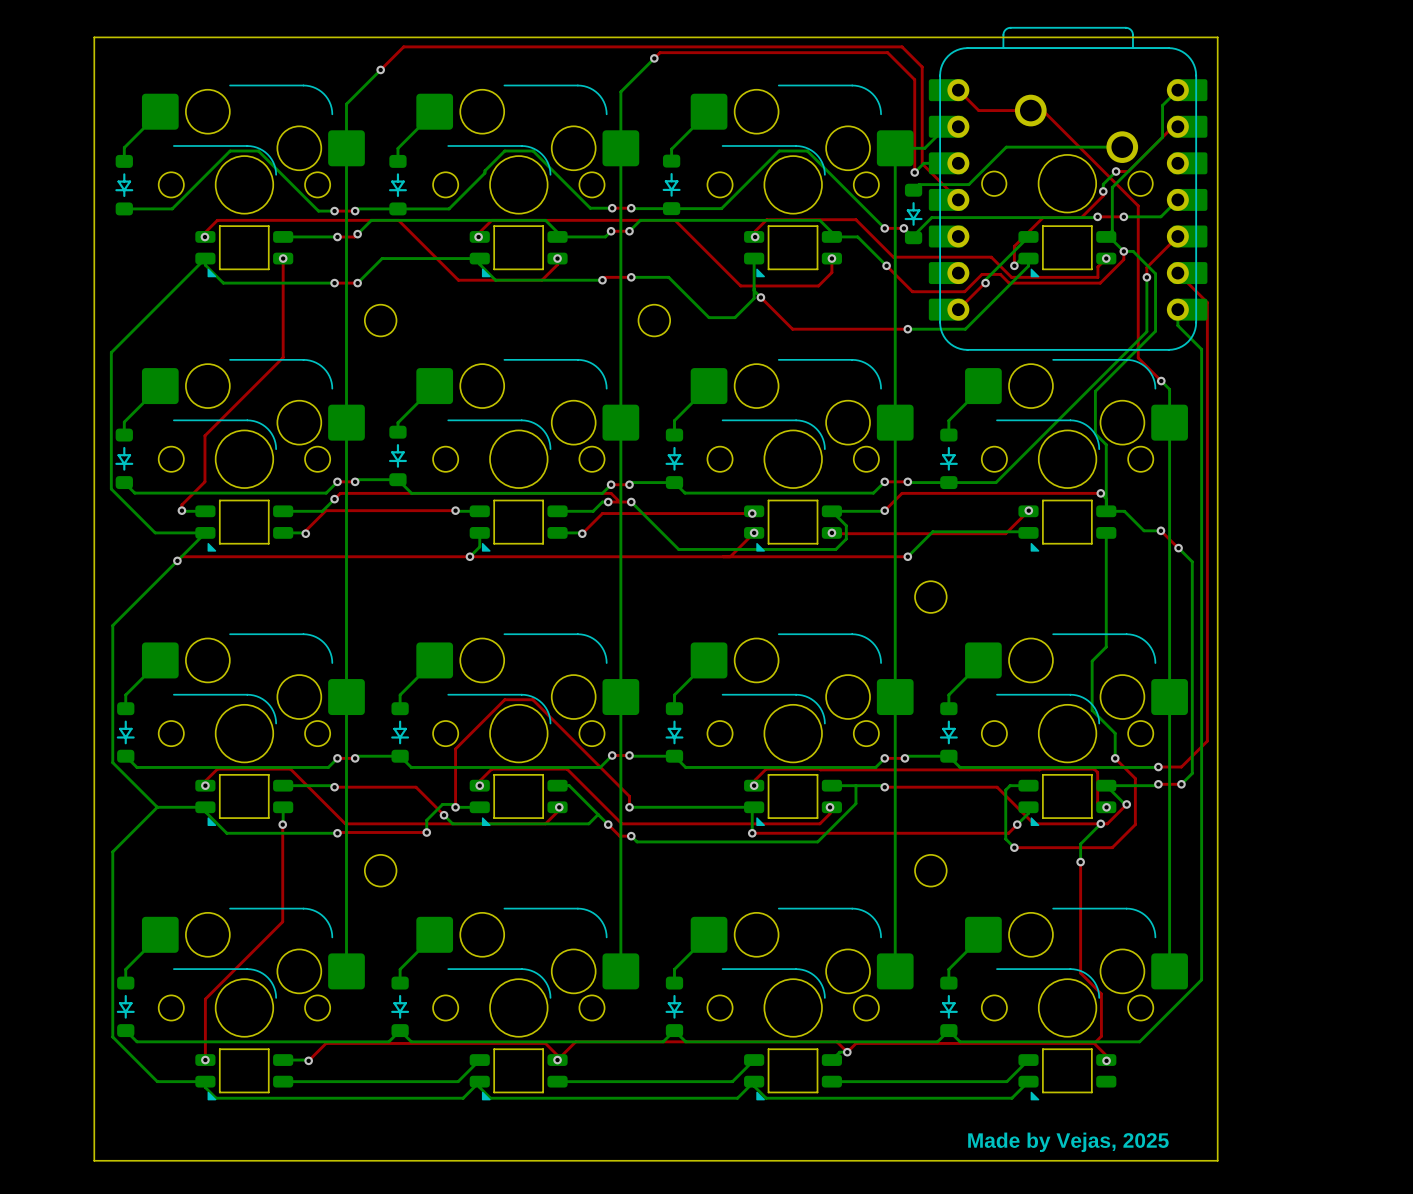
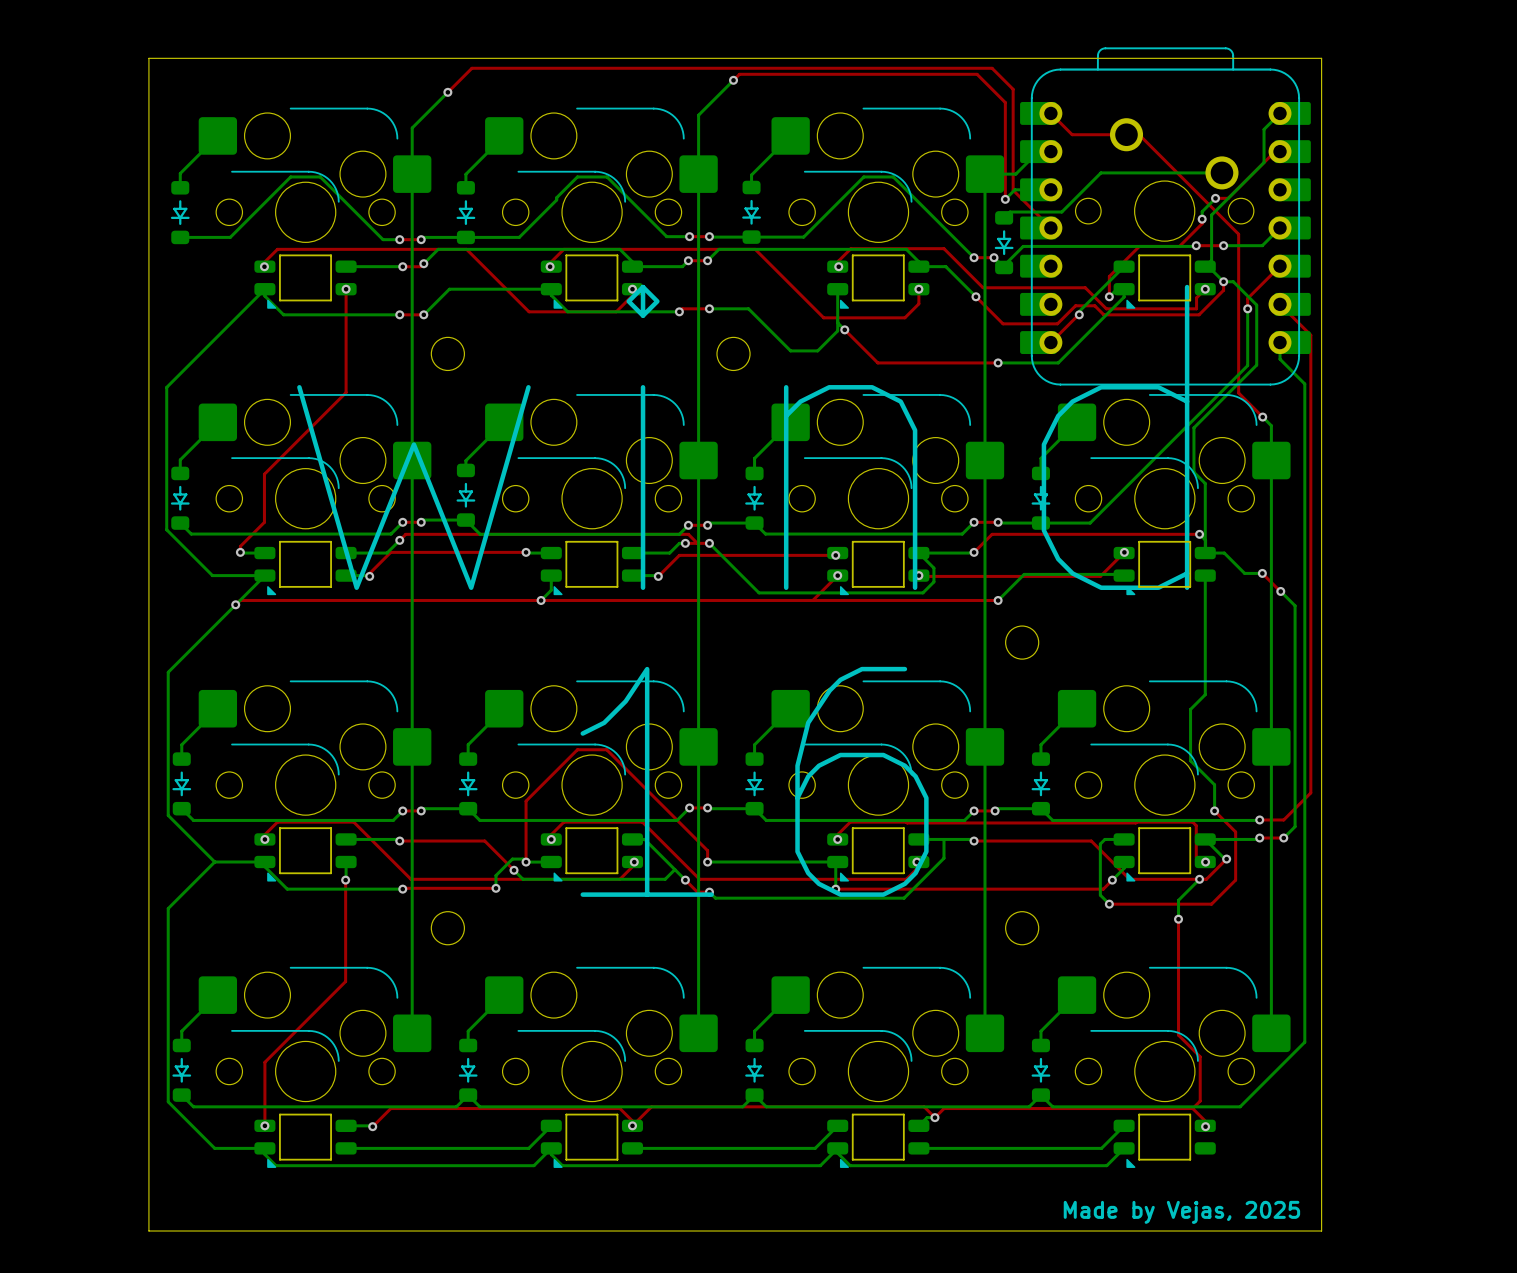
text: none -> wind (743, 437)
text: none -> 16 (754, 781)

